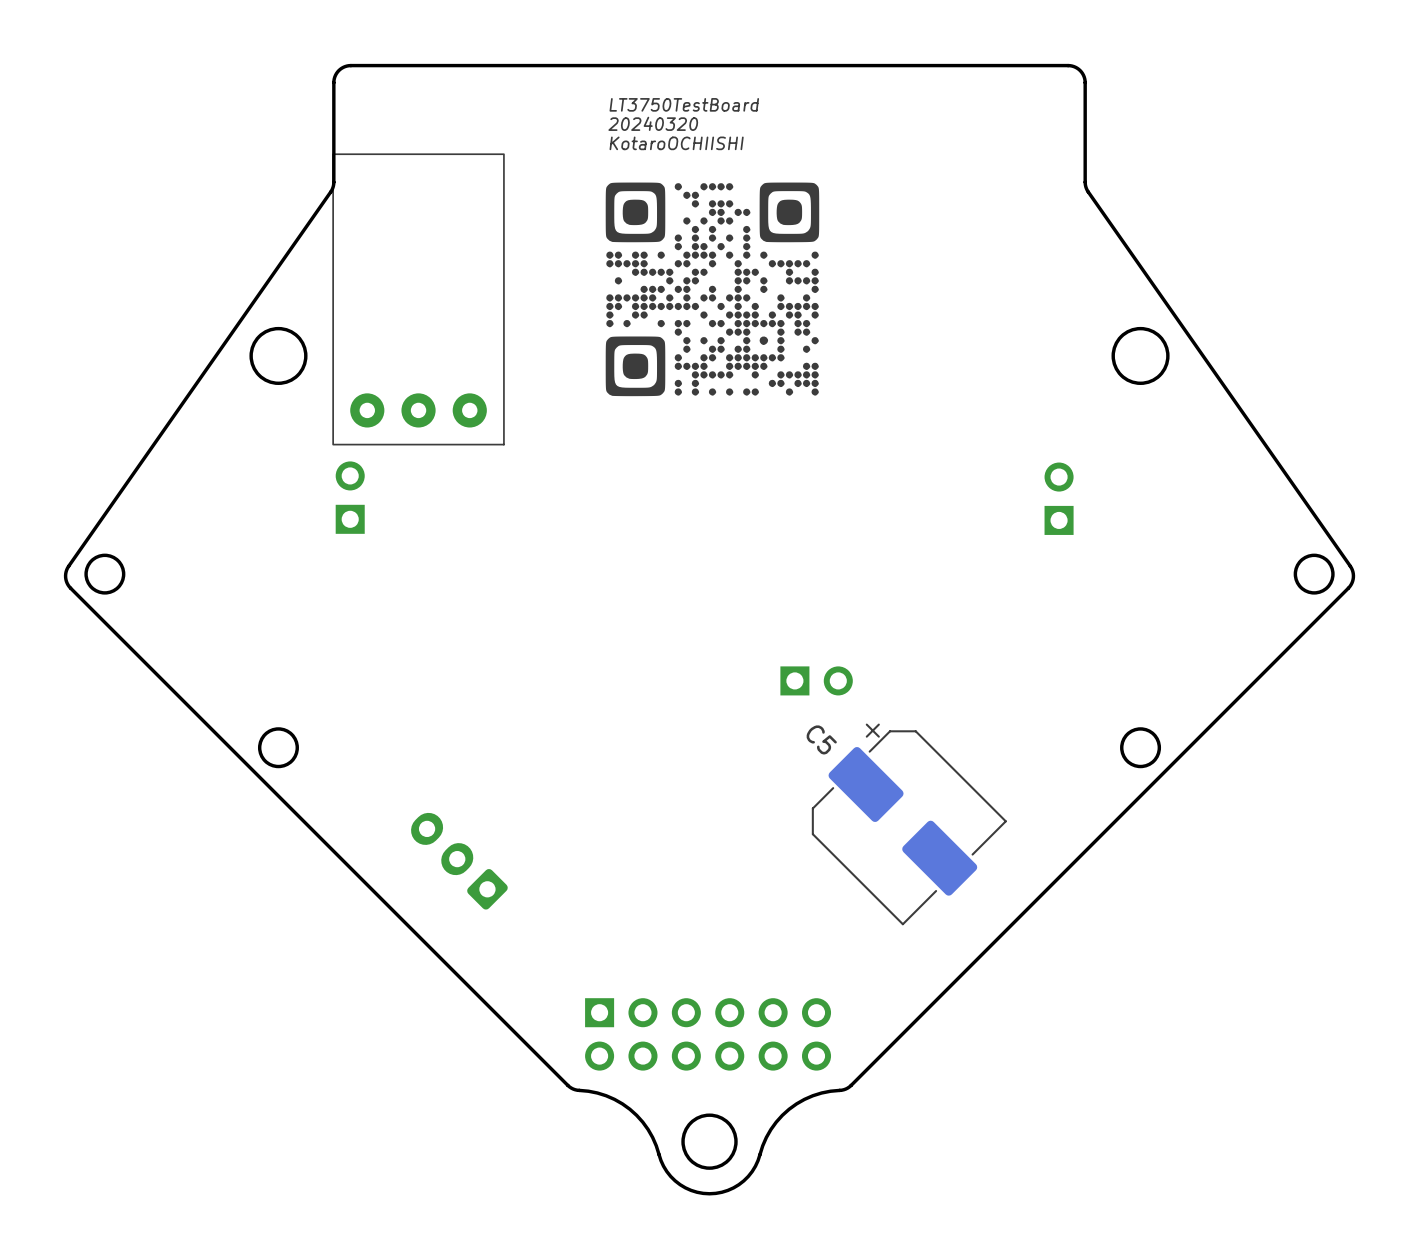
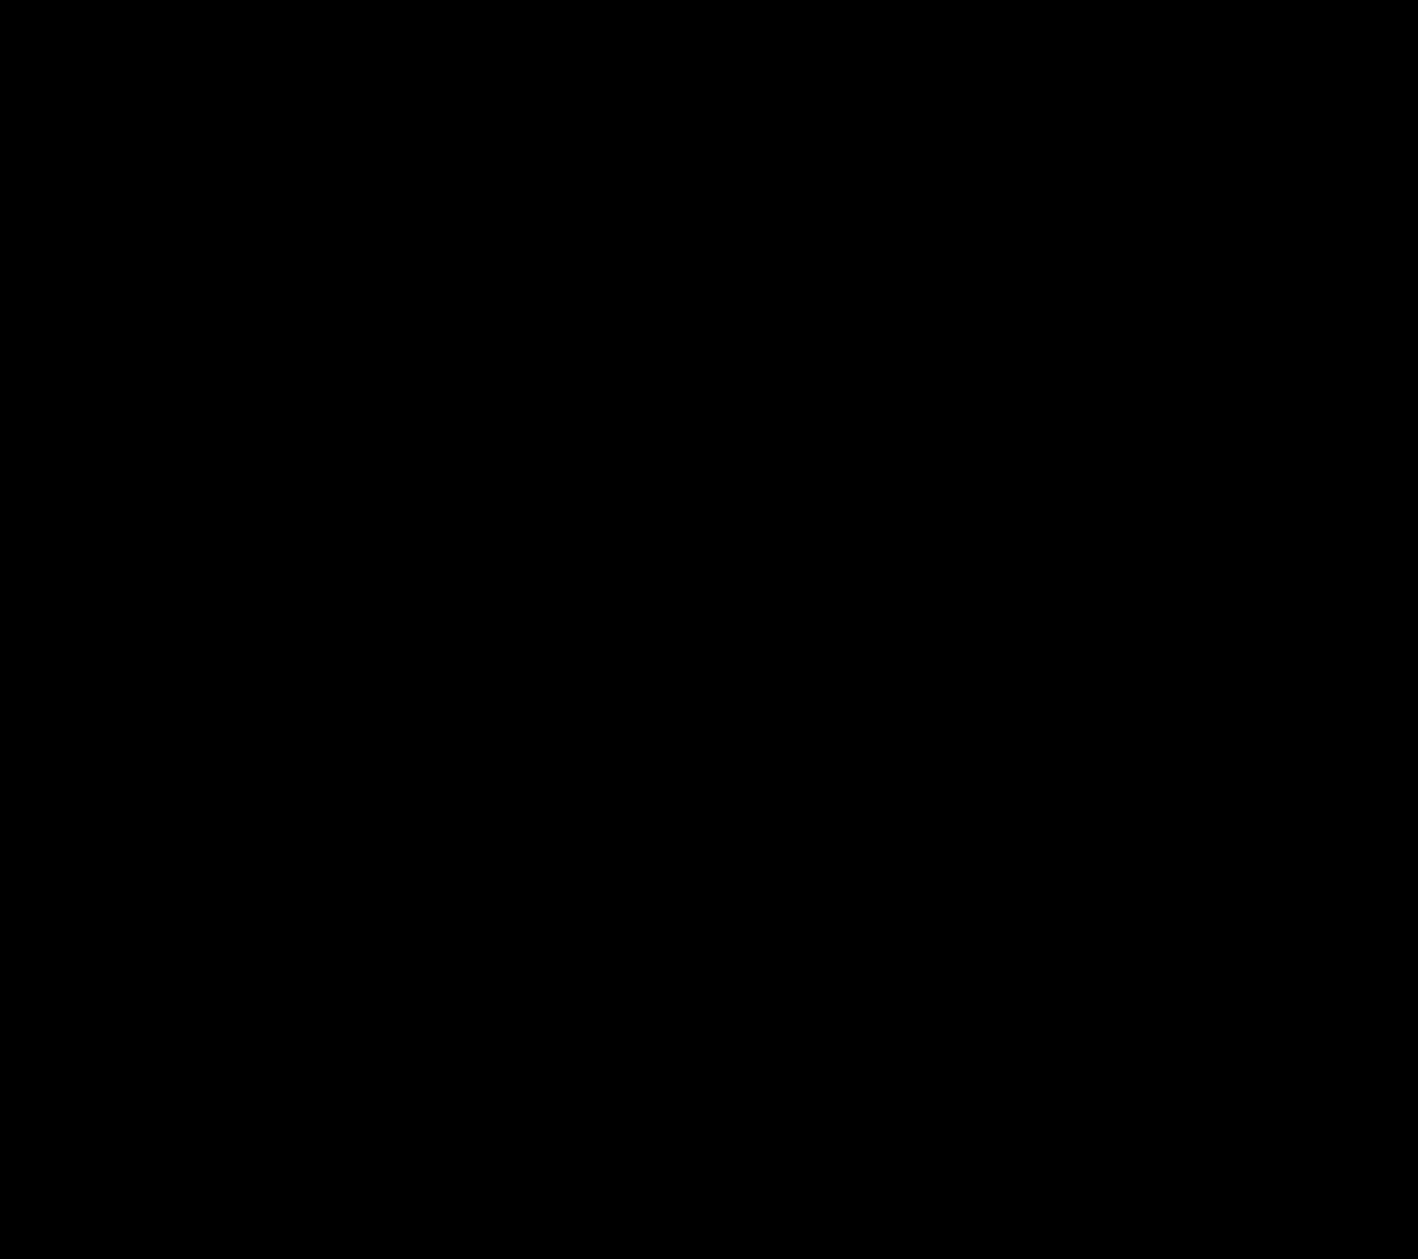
board edge: (1068, 65) (350, 65) (343, 67) (337, 72) (333, 80) (333, 182) (331, 190) (66, 569) (65, 579) (70, 588) (567, 1085) (575, 1089) (597, 1093) (614, 1099) (636, 1115) (652, 1137) (666, 1171) (680, 1184) (691, 1190) (715, 1193) (738, 1184) (755, 1166) (770, 1129) (789, 1109) (812, 1095) (843, 1089) (851, 1085) (1348, 588) (1352, 581) (1353, 573) (1350, 566) (1087, 190) (1085, 182) (1085, 80) (1078, 69) (1068, 65) -> none
text: LT3750TestBoard (684, 104) -> none
text: 20240320 (653, 123) -> none
text: KotaroOCHIISHI (676, 143) -> none
drawing: [605, 182, 820, 397] -> none
part: (418, 299) -> none
round board edge: [249, 326, 308, 385] -> none
round board edge: [1111, 326, 1170, 385] -> none
part: (350, 497) -> none
part: (1059, 498) -> none
round board edge: [84, 553, 126, 595] -> none
round board edge: [1293, 553, 1335, 595] -> none
part: (816, 680) -> none
round board edge: [257, 727, 299, 769] -> none
round board edge: [1120, 727, 1162, 769] -> none
C5: (909, 824) -> none
part: (459, 861) -> none
part: (708, 1034) -> none
round board edge: [681, 1113, 738, 1170] -> none

